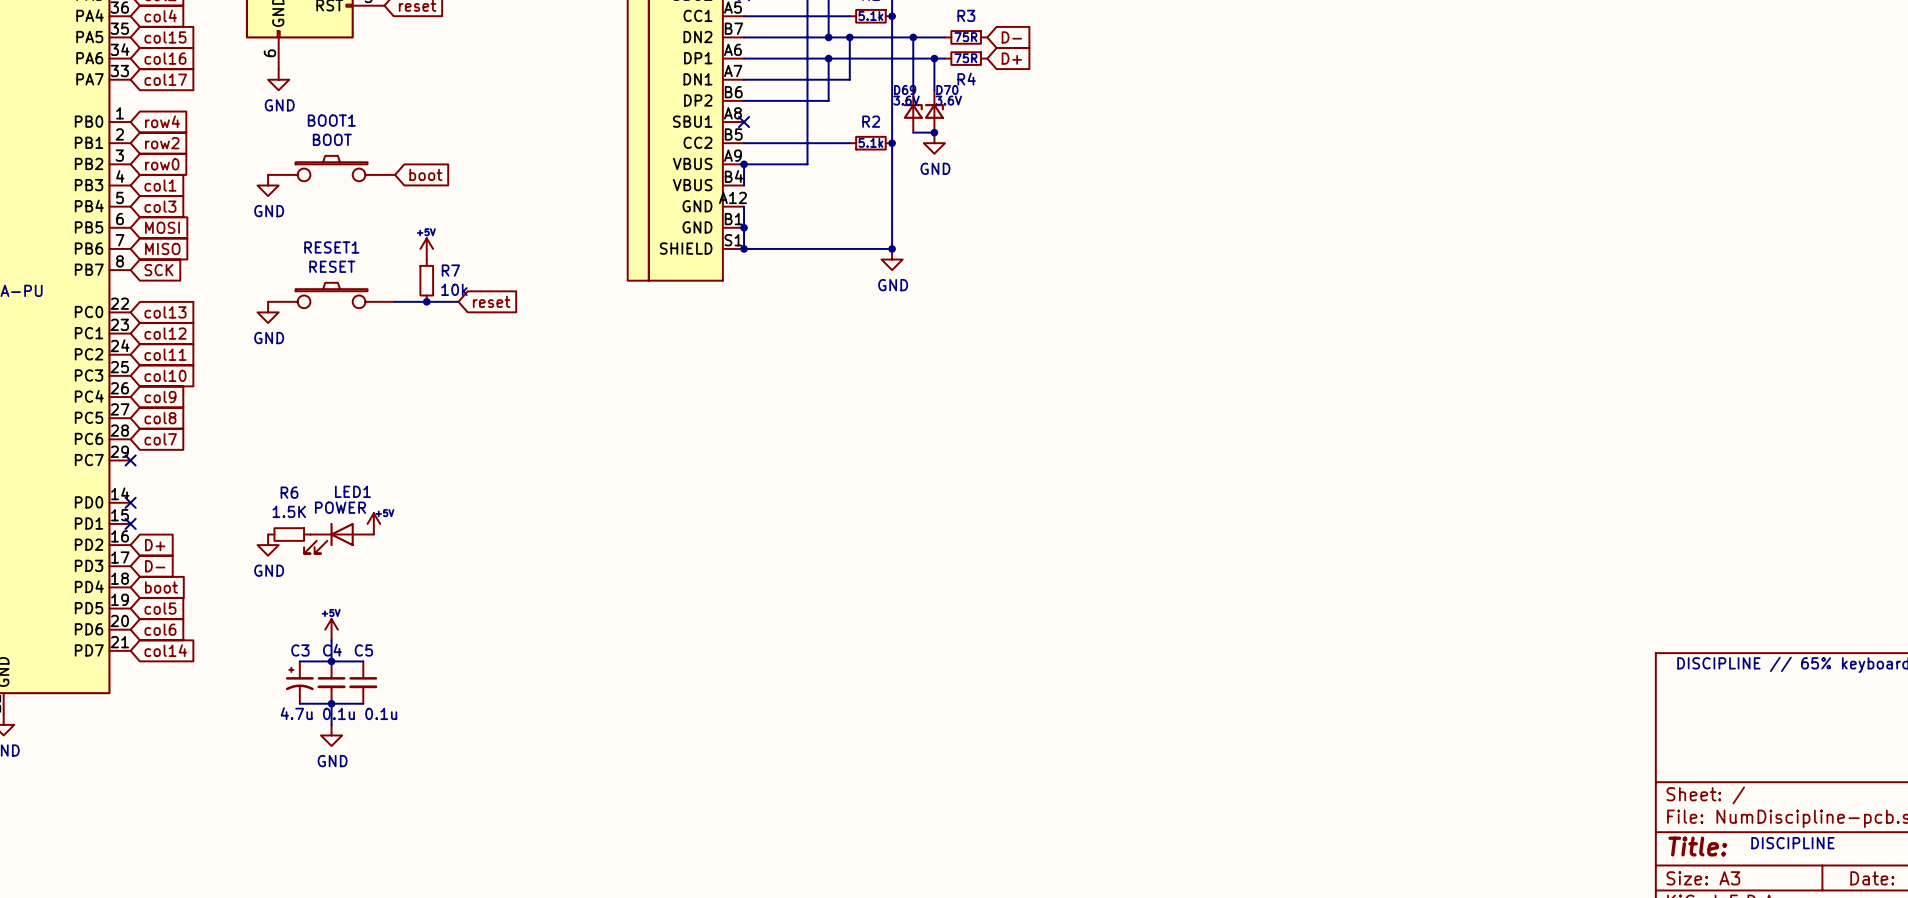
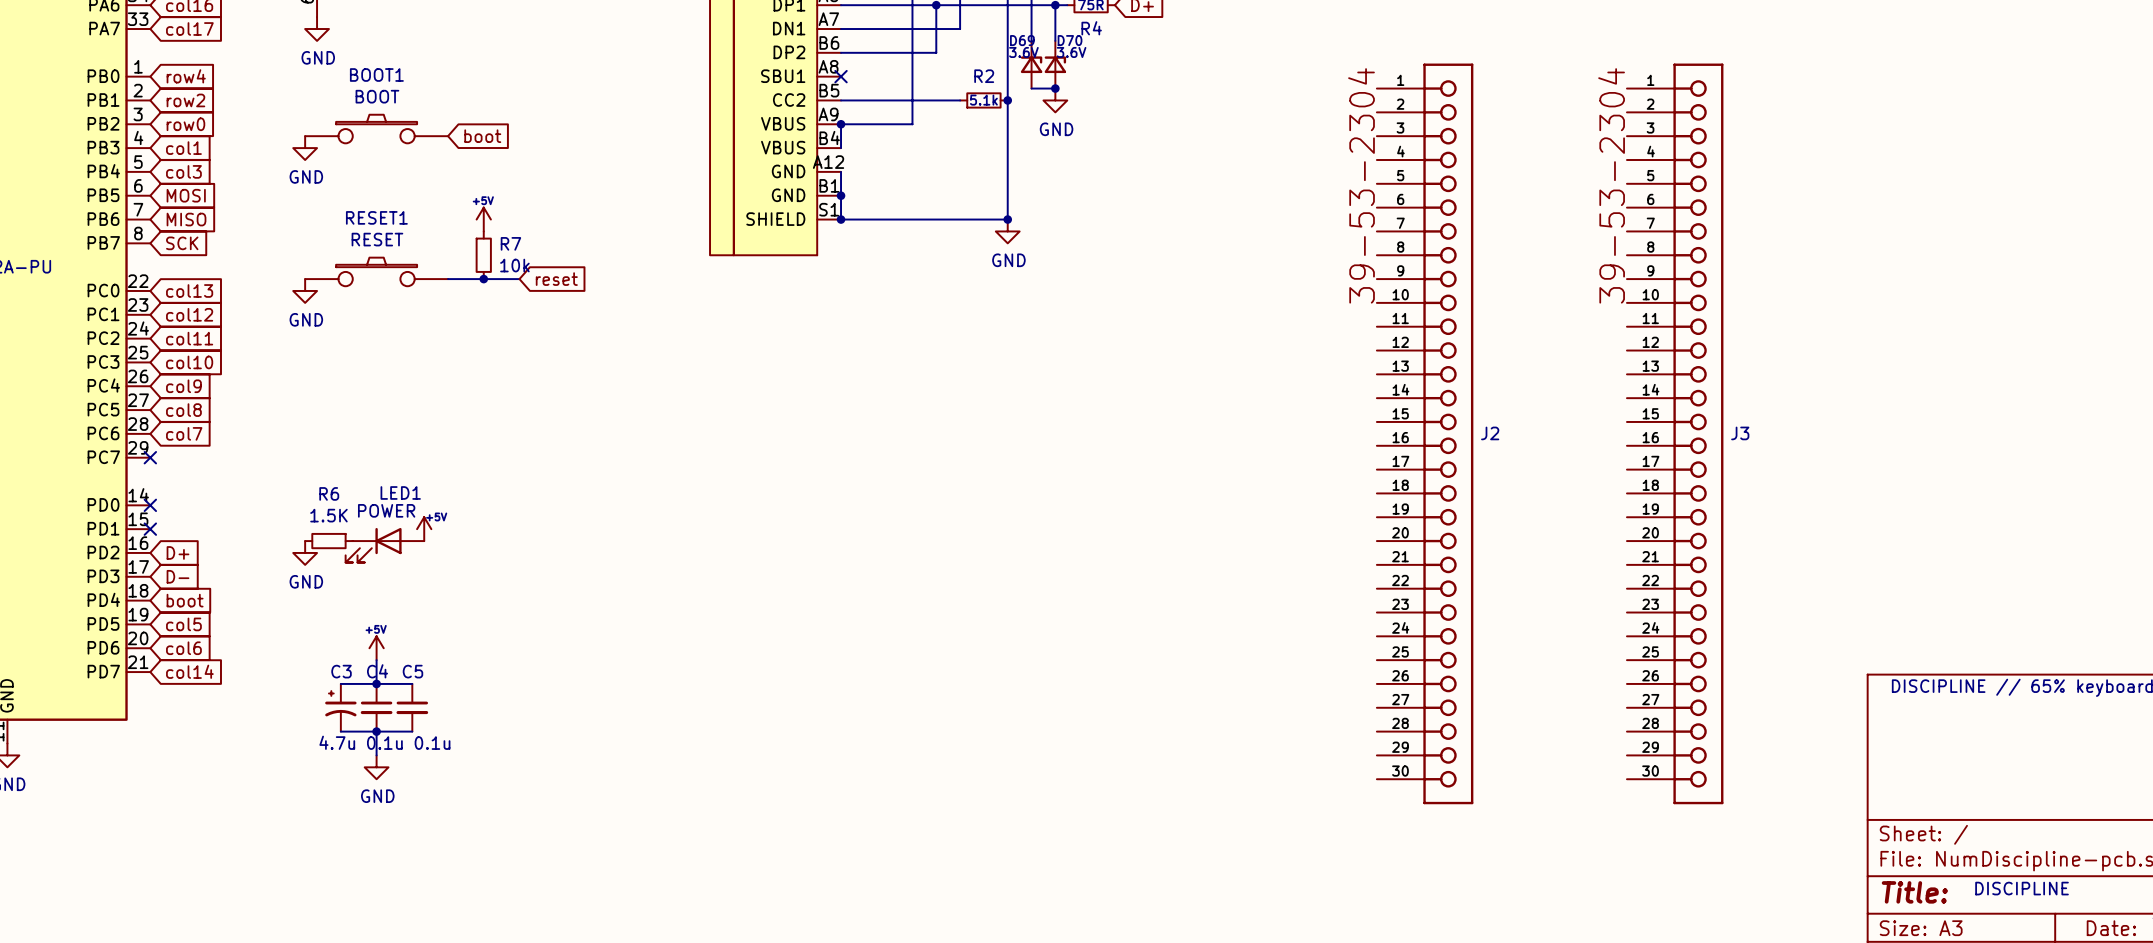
J2: none -> (1425, 433)
J3: none -> (1675, 433)

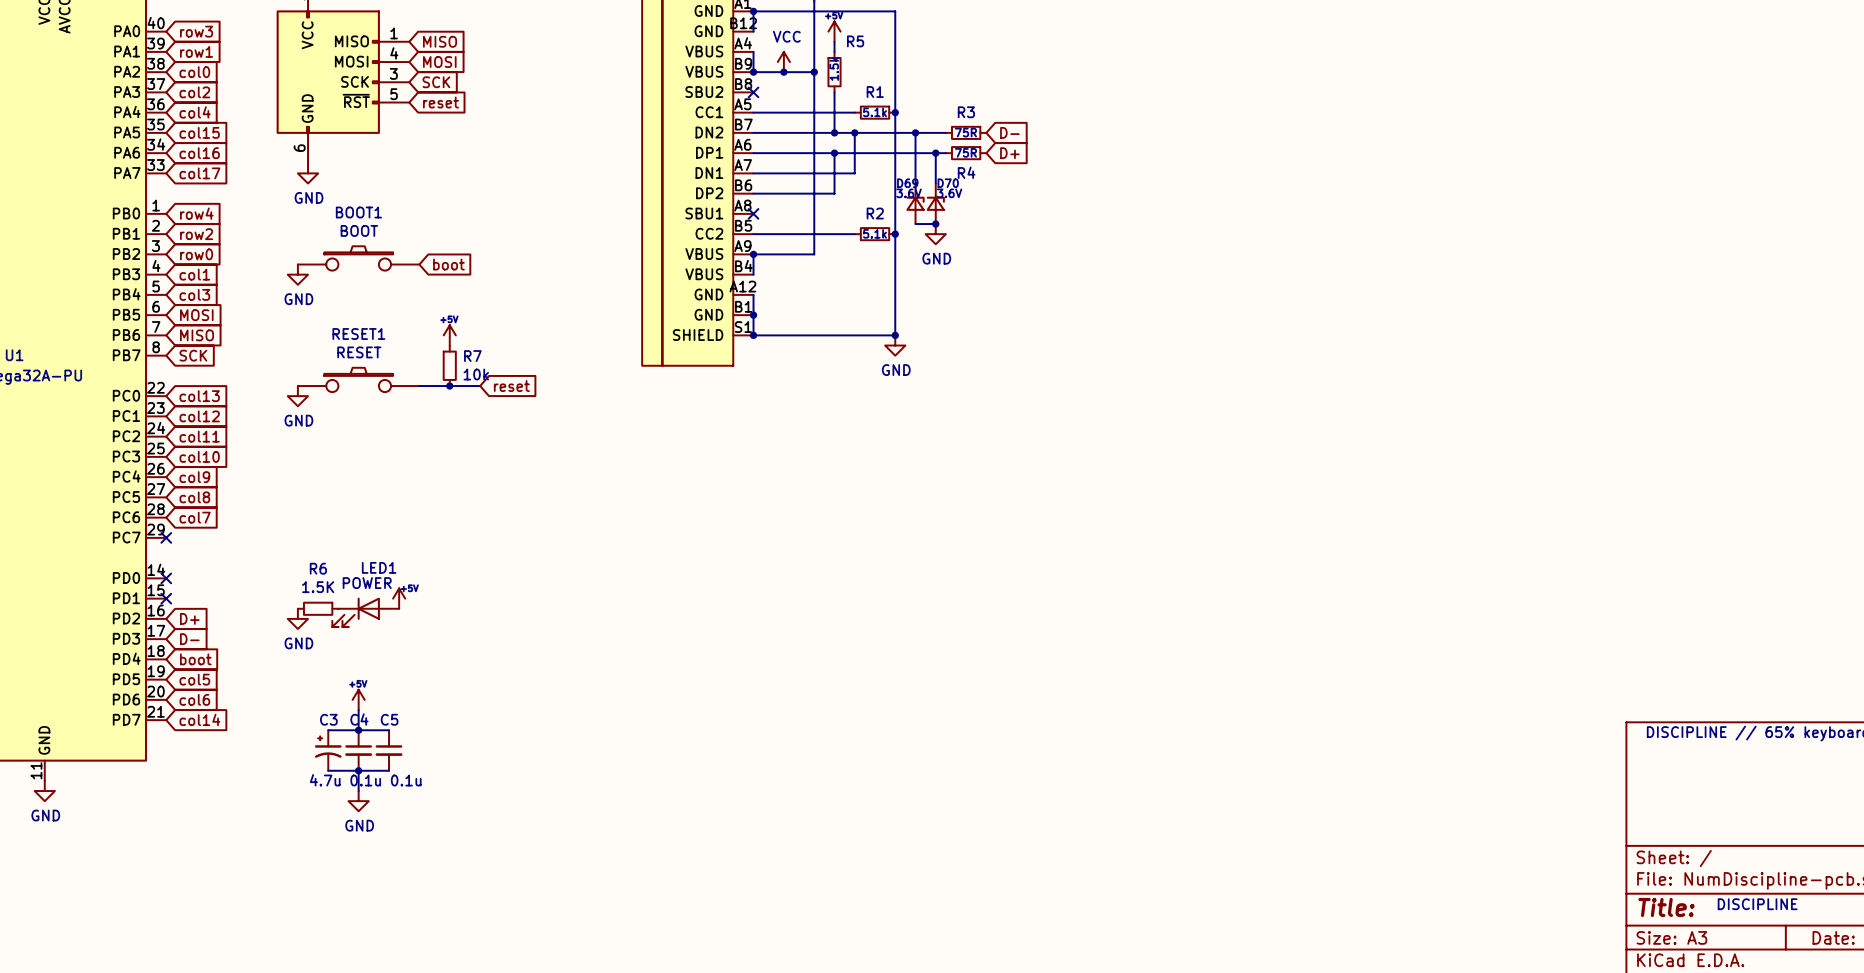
J2: (1425, 433) -> none
J3: (1675, 433) -> none

